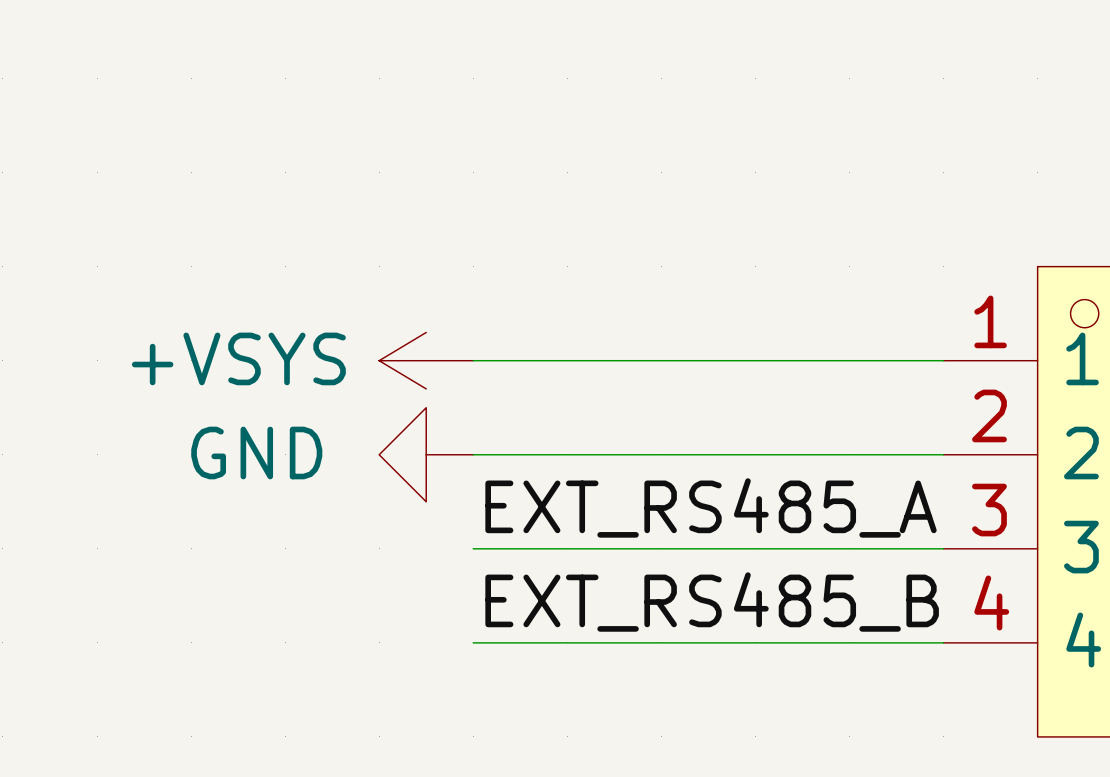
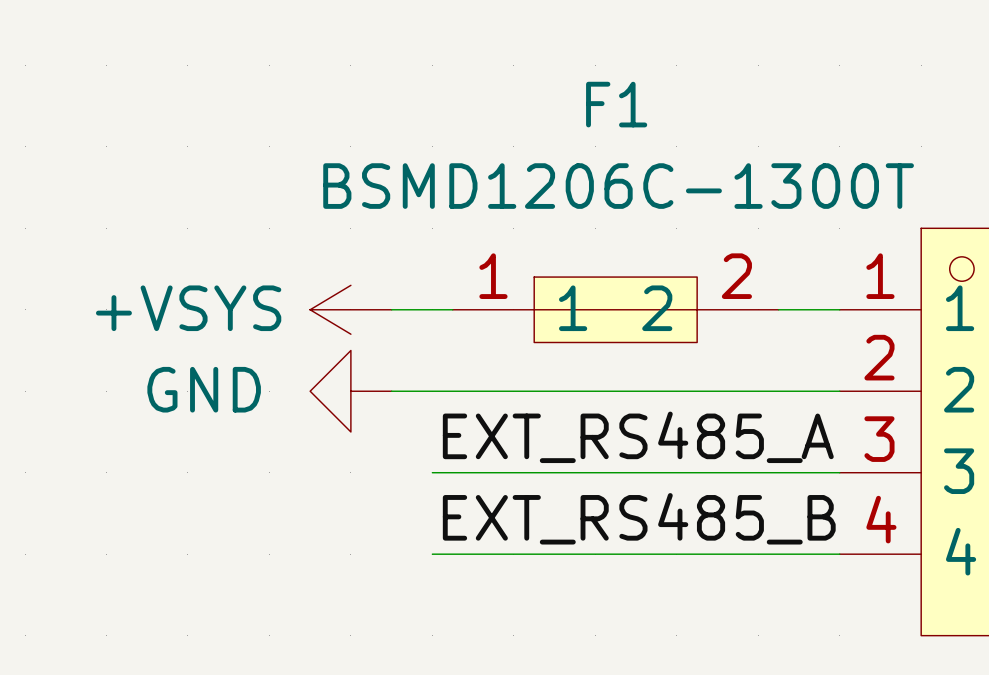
power symbol position: +VSYS (426, 360) -> +VSYS (350, 309)
F1: none -> BSMD1206C-1300T (615, 309)
power symbol position: GND (426, 454) -> GND (350, 391)

